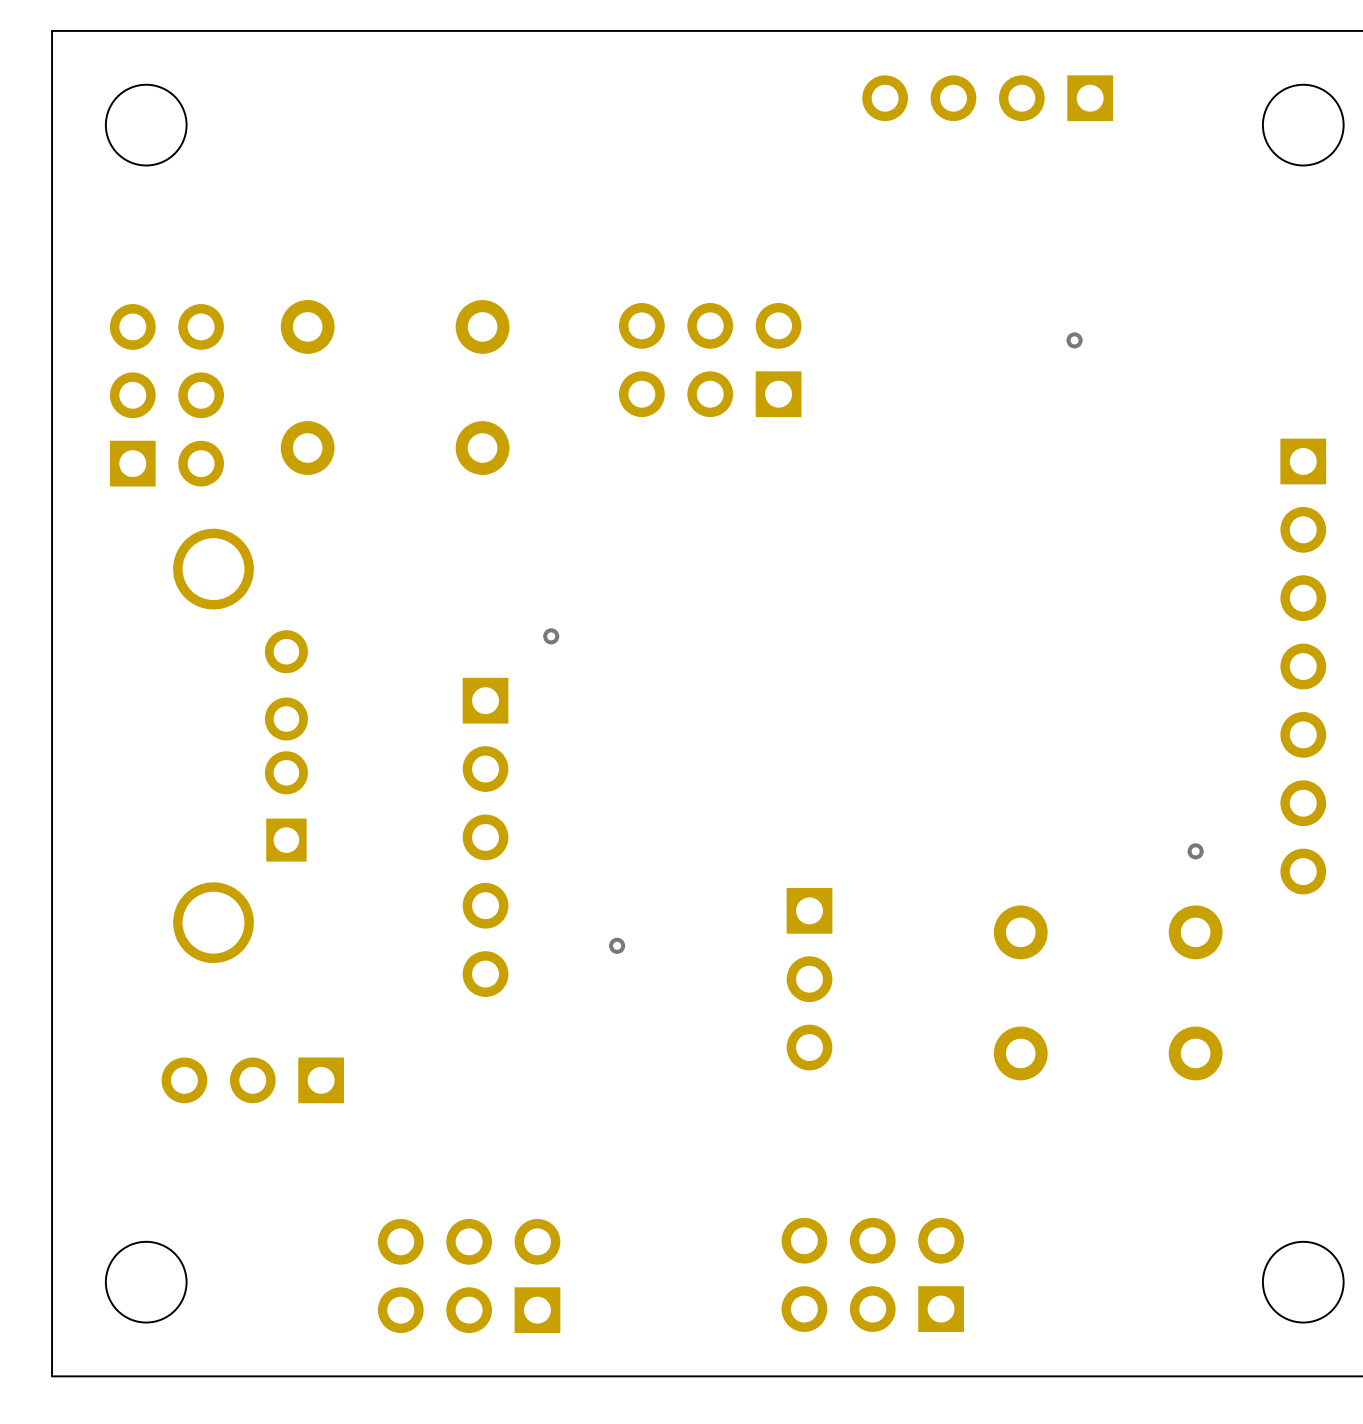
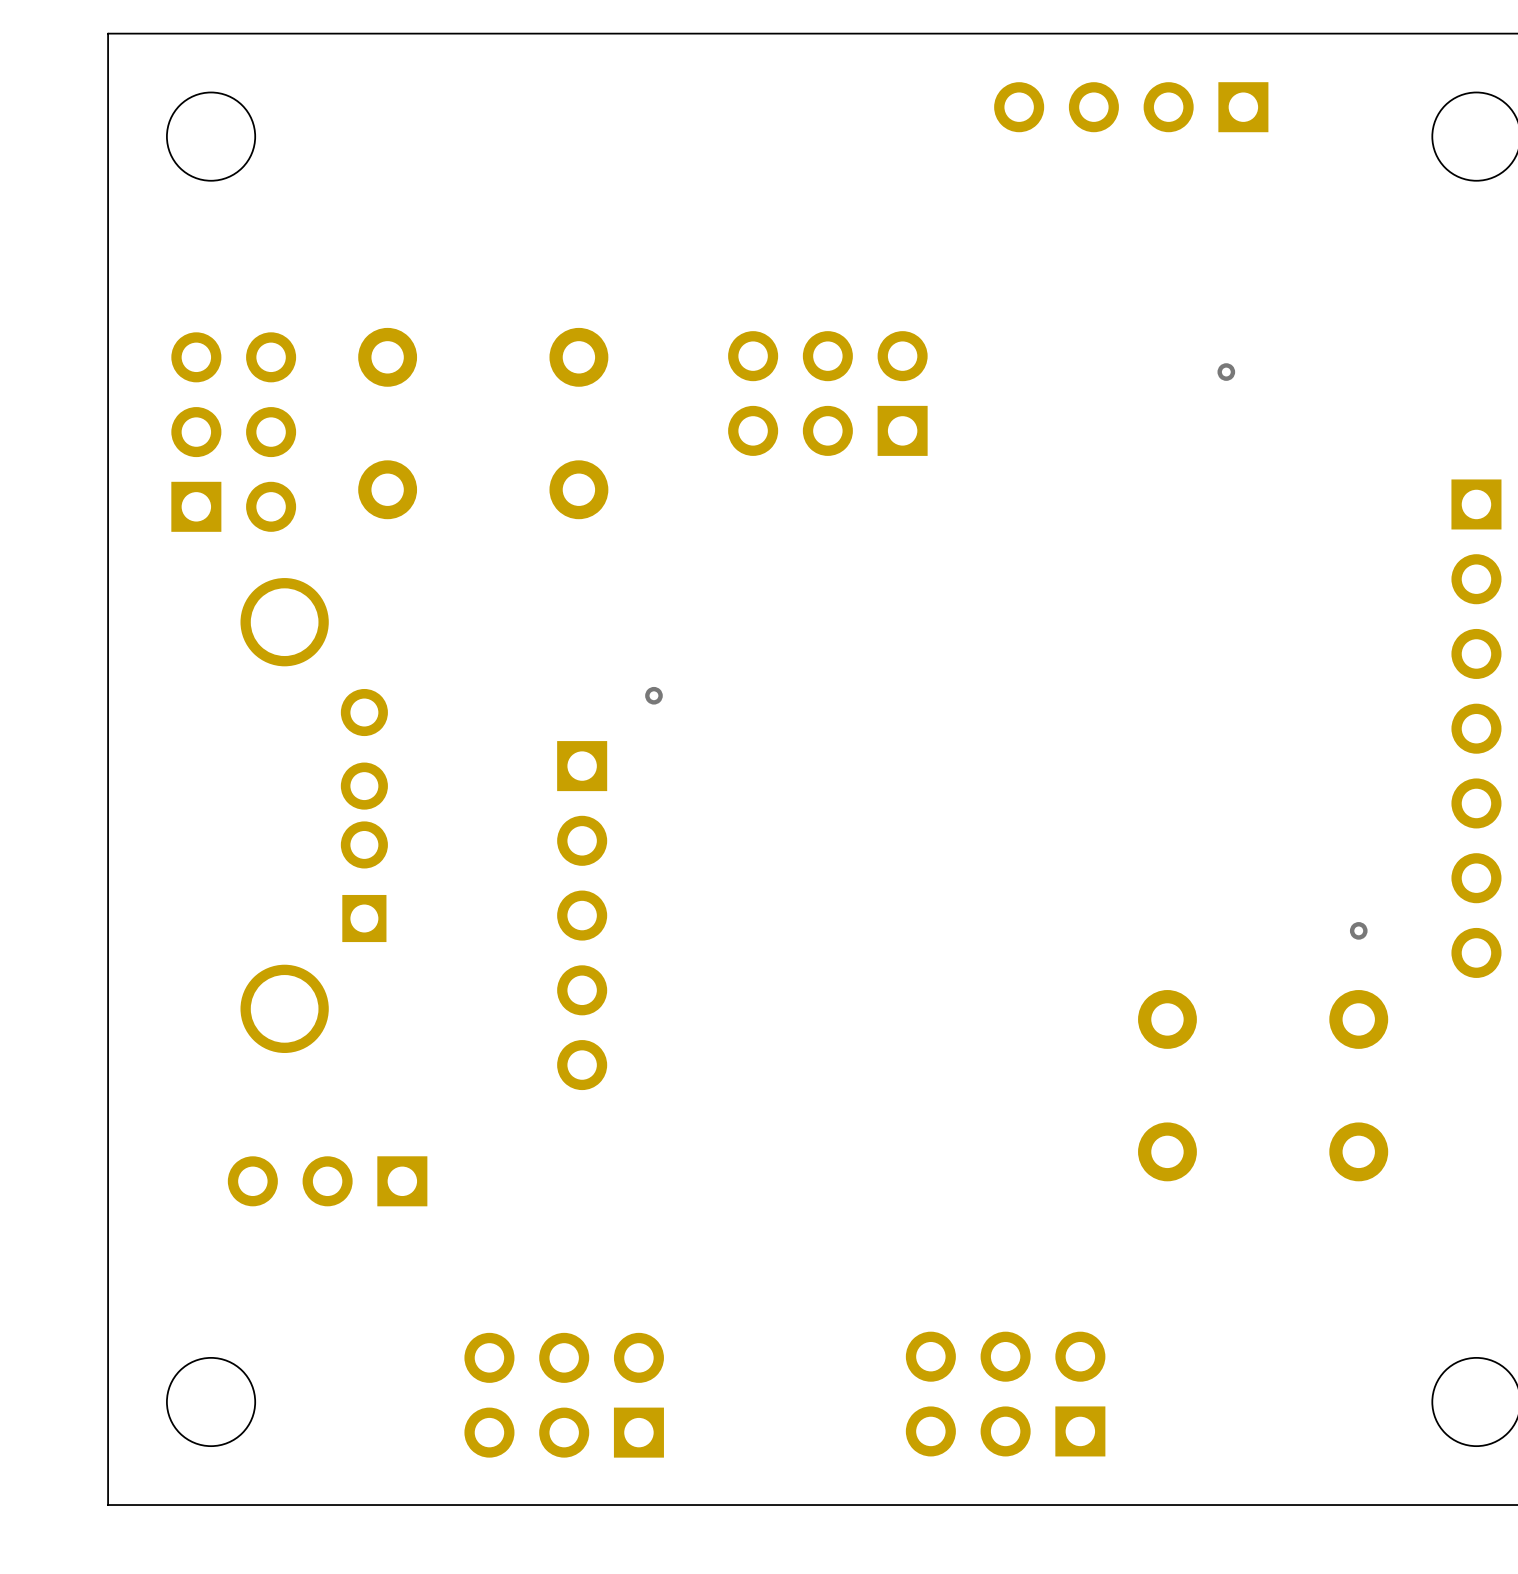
via: (617, 945) -> none
part: (809, 979) -> none

